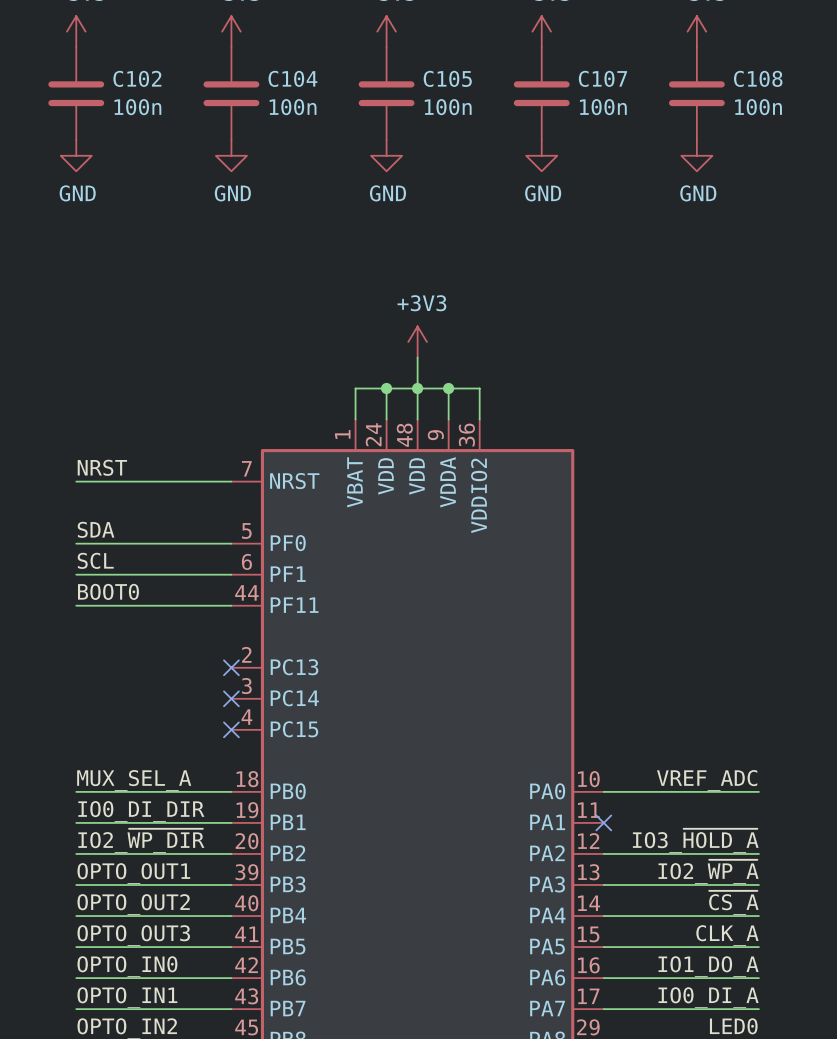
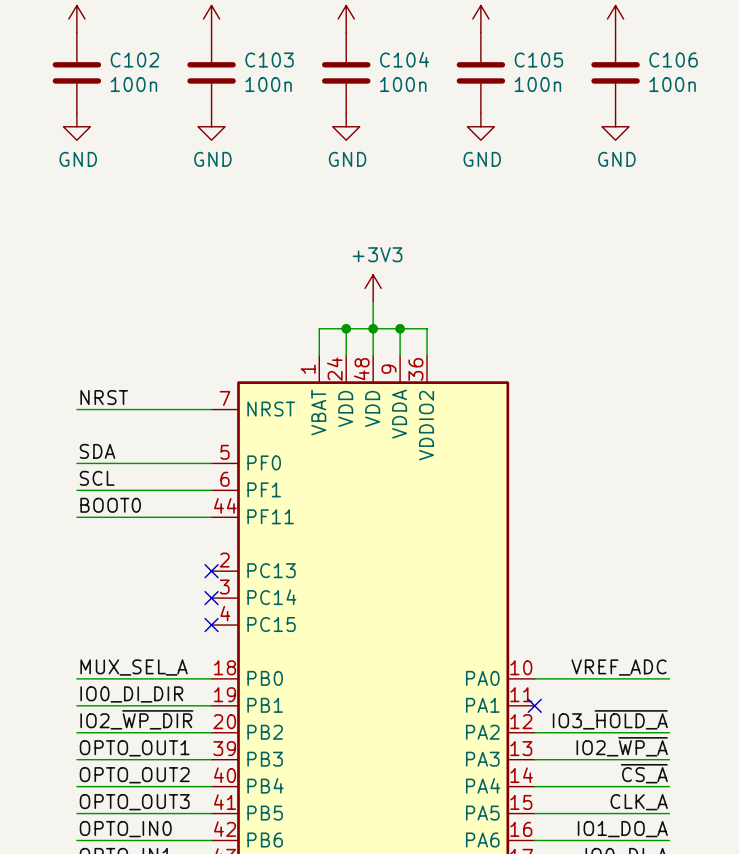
C104 name: C104 (292, 78) -> C103 (269, 60)
C105 name: C105 (447, 78) -> C104 (404, 59)
C107 name: C107 (602, 78) -> C105 (538, 60)
C108 name: C108 (758, 78) -> C106 (673, 60)

